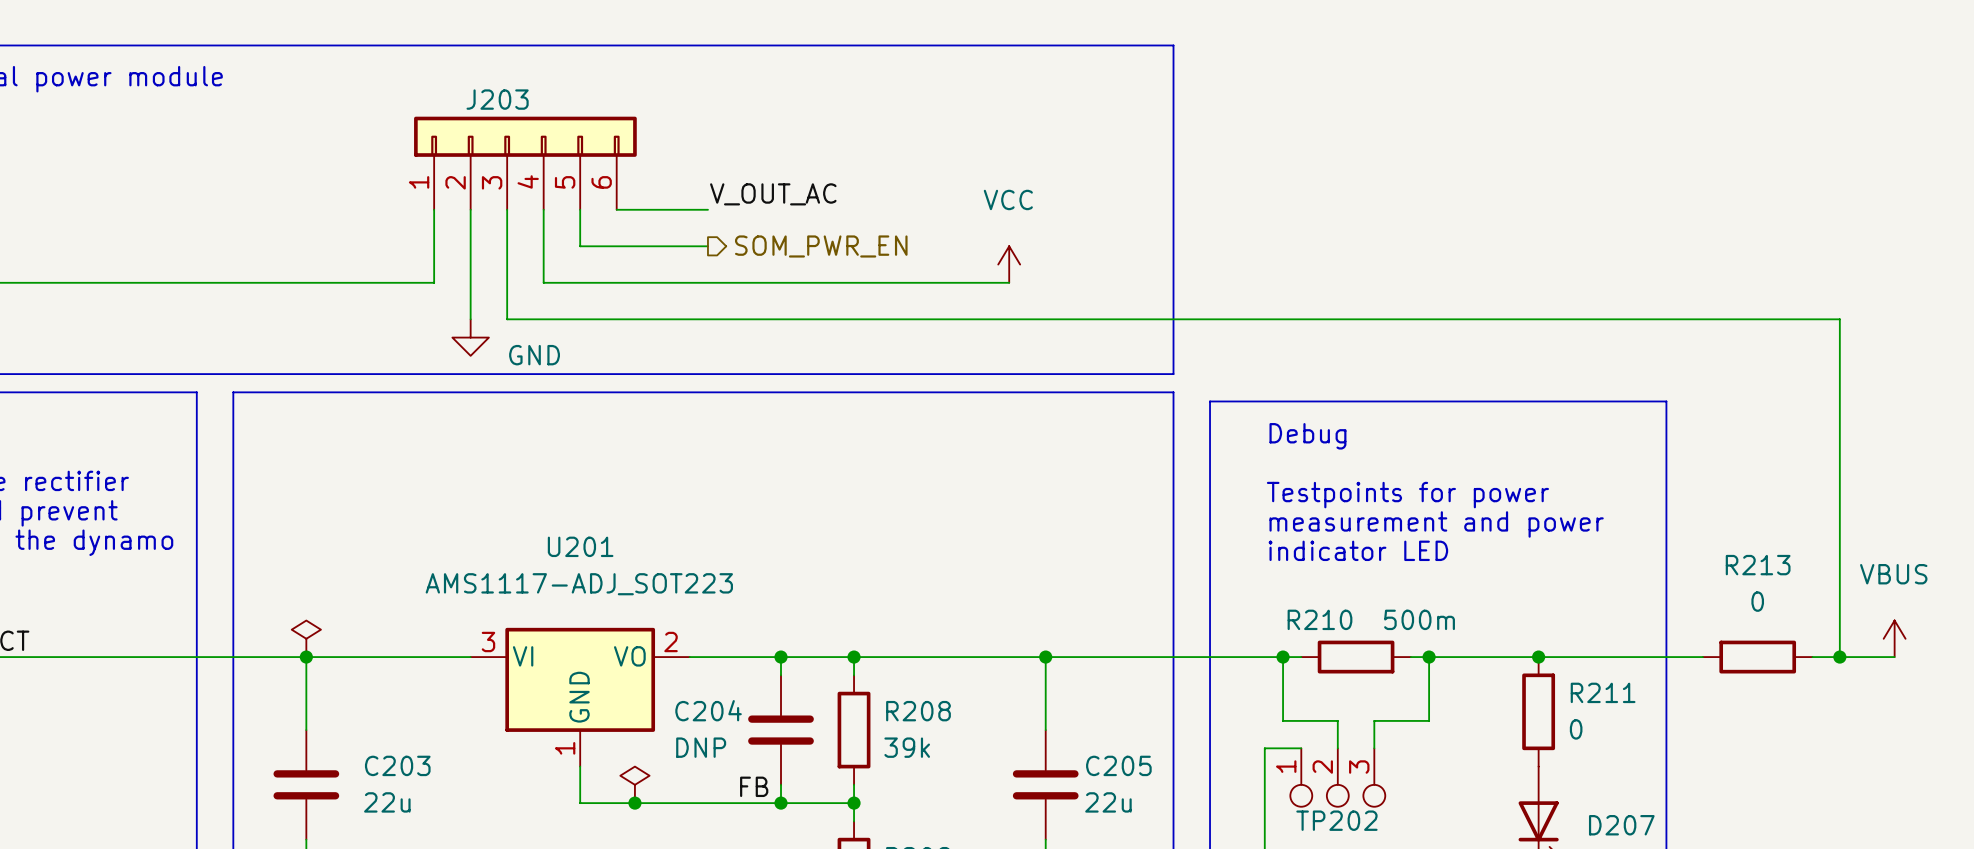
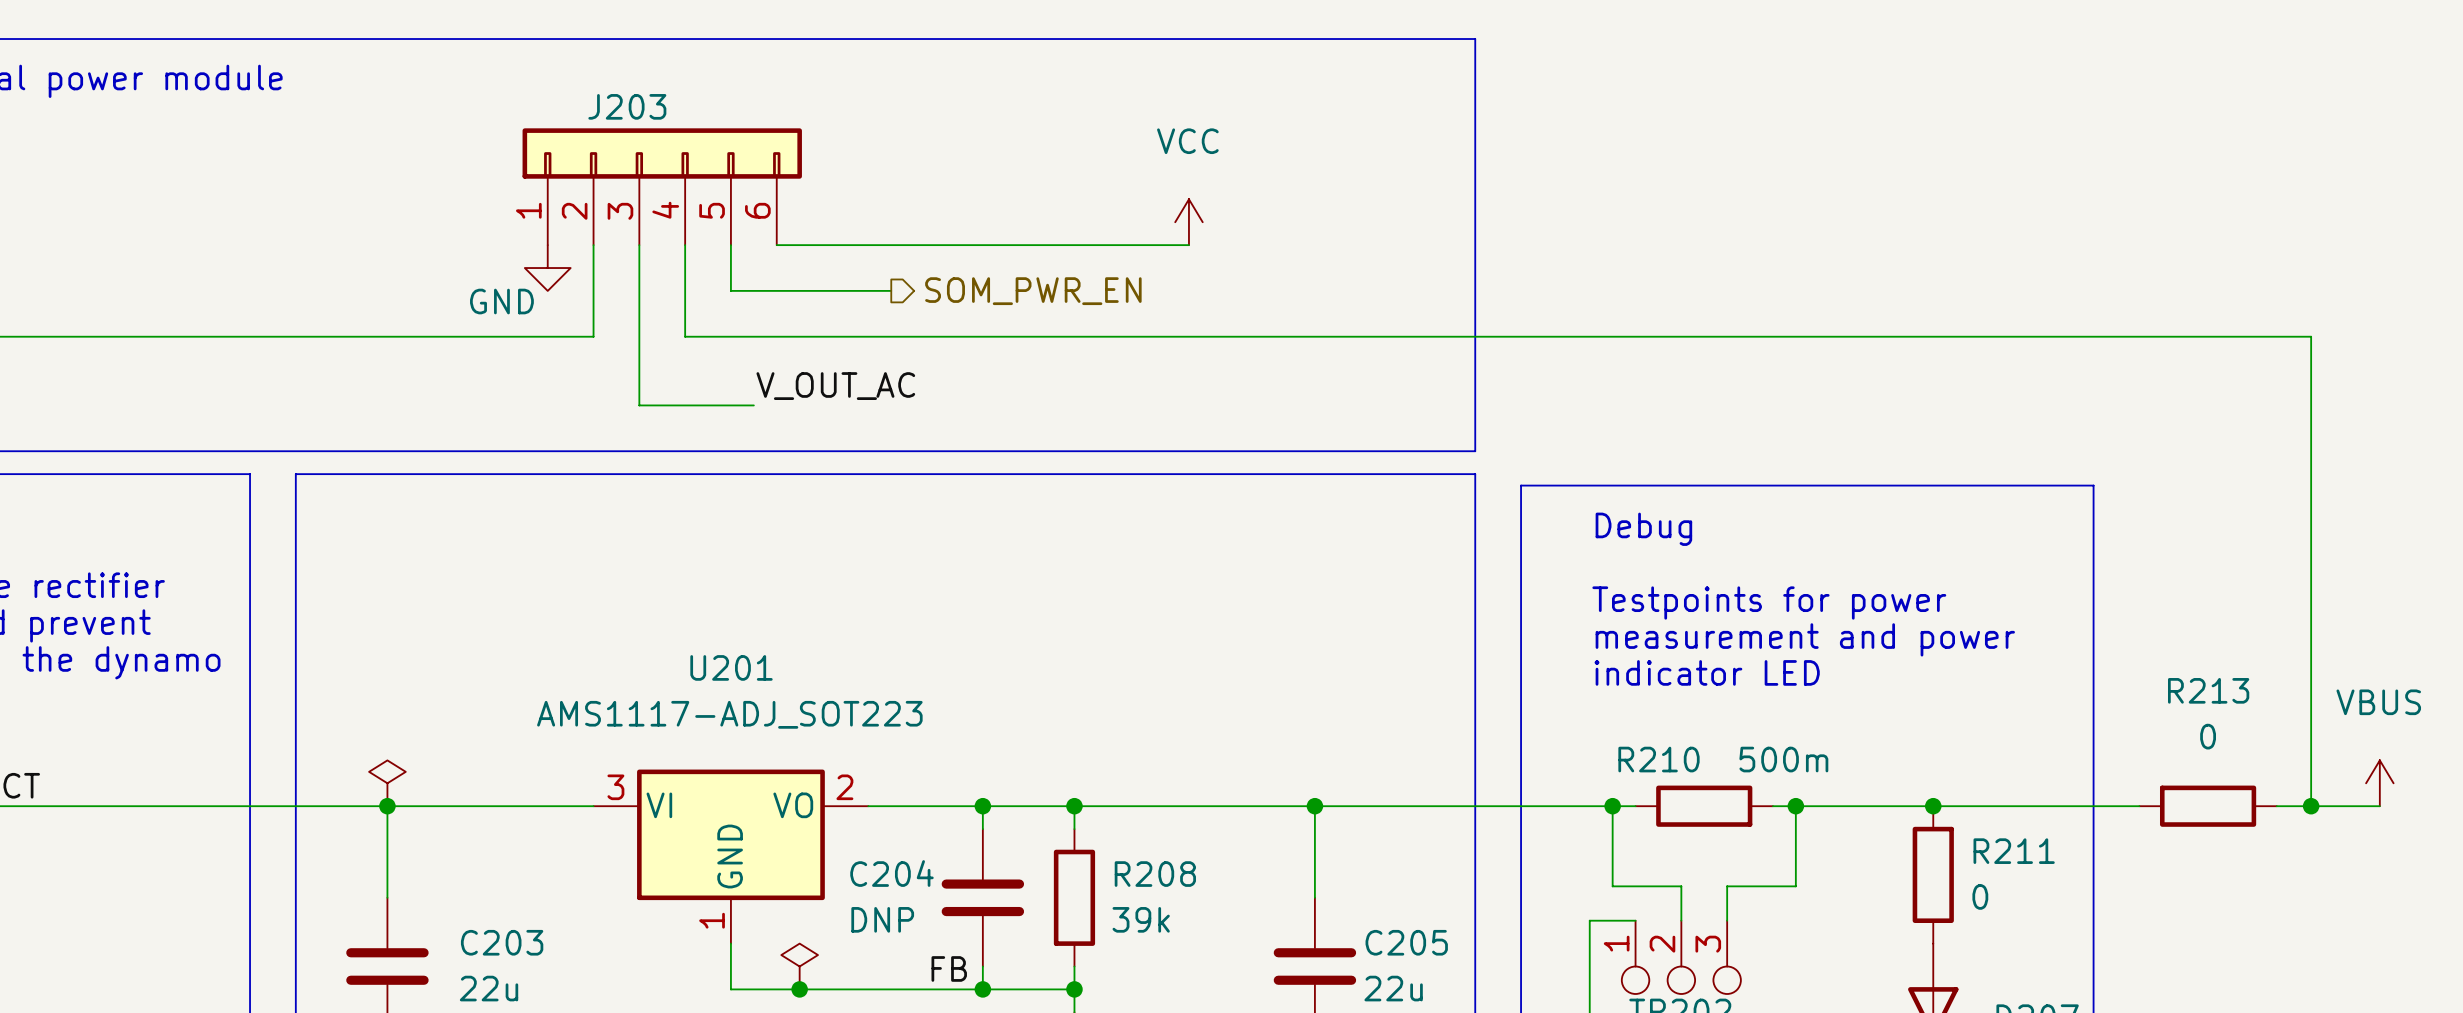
label position: V_OUT_AC (773, 194) -> V_OUT_AC (835, 386)
wire: (434, 209) (434, 282) -> none
wire: none -> (891, 245) (1188, 245)
power symbol position: VCC (1009, 264) -> VCC (1188, 222)
wire: (470, 282) (470, 319) -> (593, 336) (547, 336)
wire: (507, 319) (1839, 319) -> (1269, 336) (2311, 336) (2311, 382)
wire: none -> (639, 382) (639, 405) (753, 405)
power symbol position: GND (470, 337) -> GND (547, 268)
power symbol text position: GND (534, 355) -> GND (501, 301)

